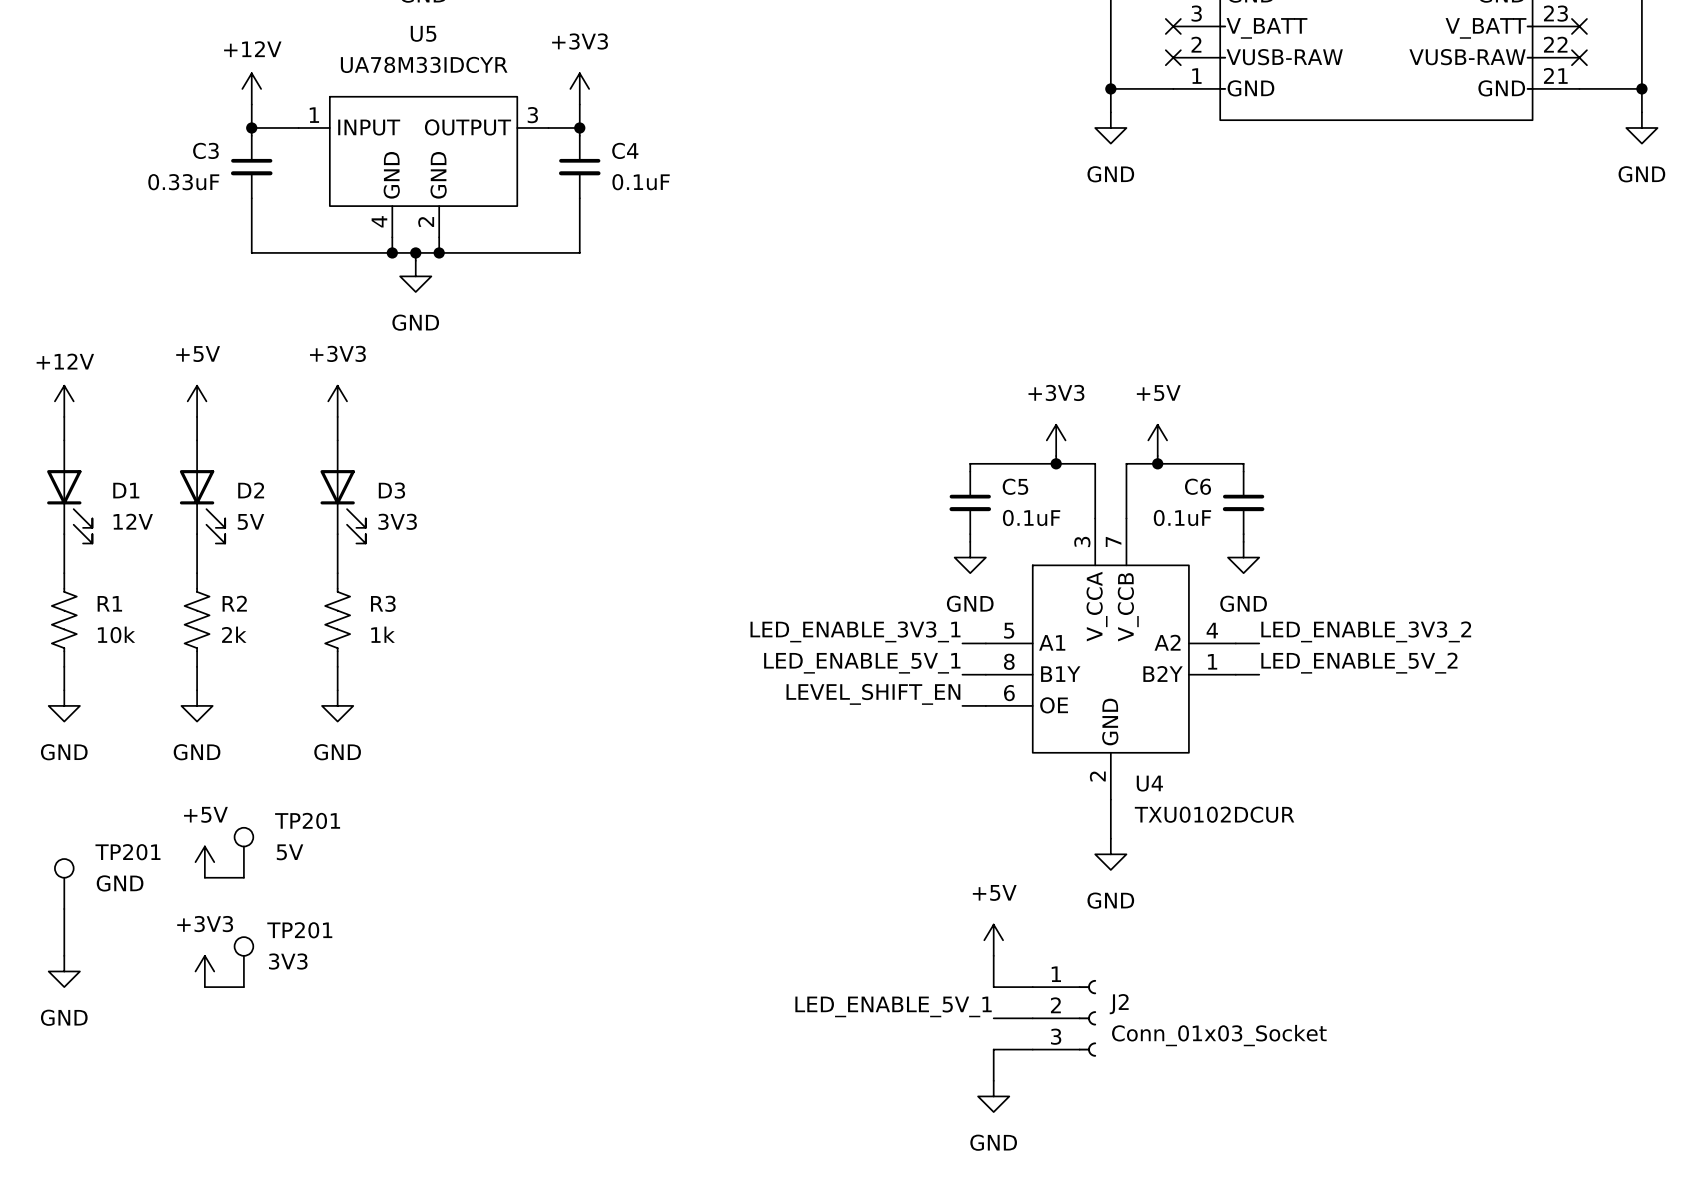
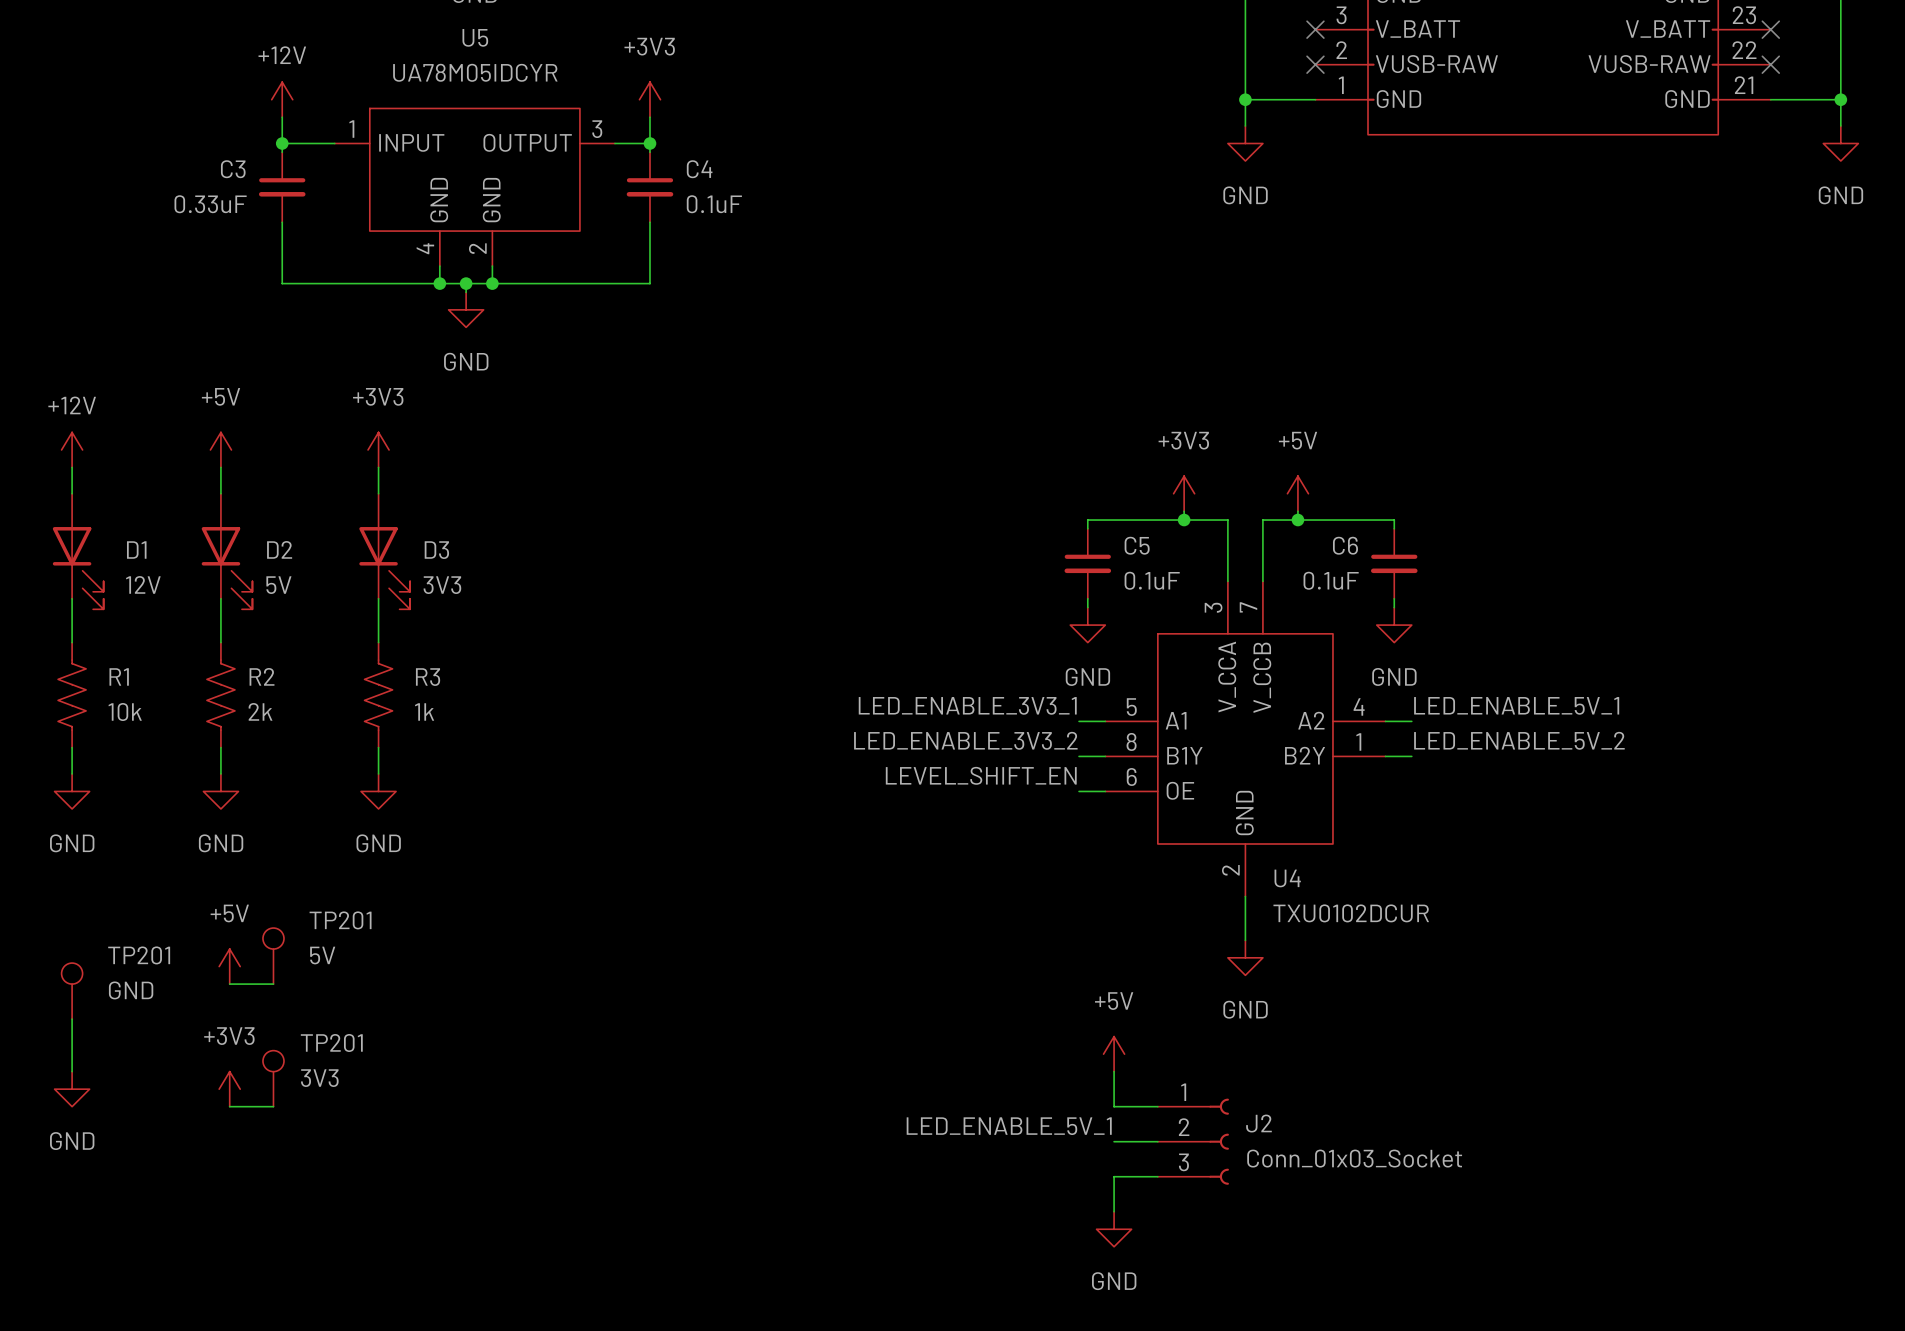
U5 value: UA78M33IDCYR (424, 64) -> UA78M05IDCYR (475, 72)
label: LED_ENABLE_3V3_2 (1366, 631) -> LED_ENABLE_5V_1 (1516, 705)
label: LED_ENABLE_5V_1 (862, 663) -> LED_ENABLE_3V3_2 (965, 740)

